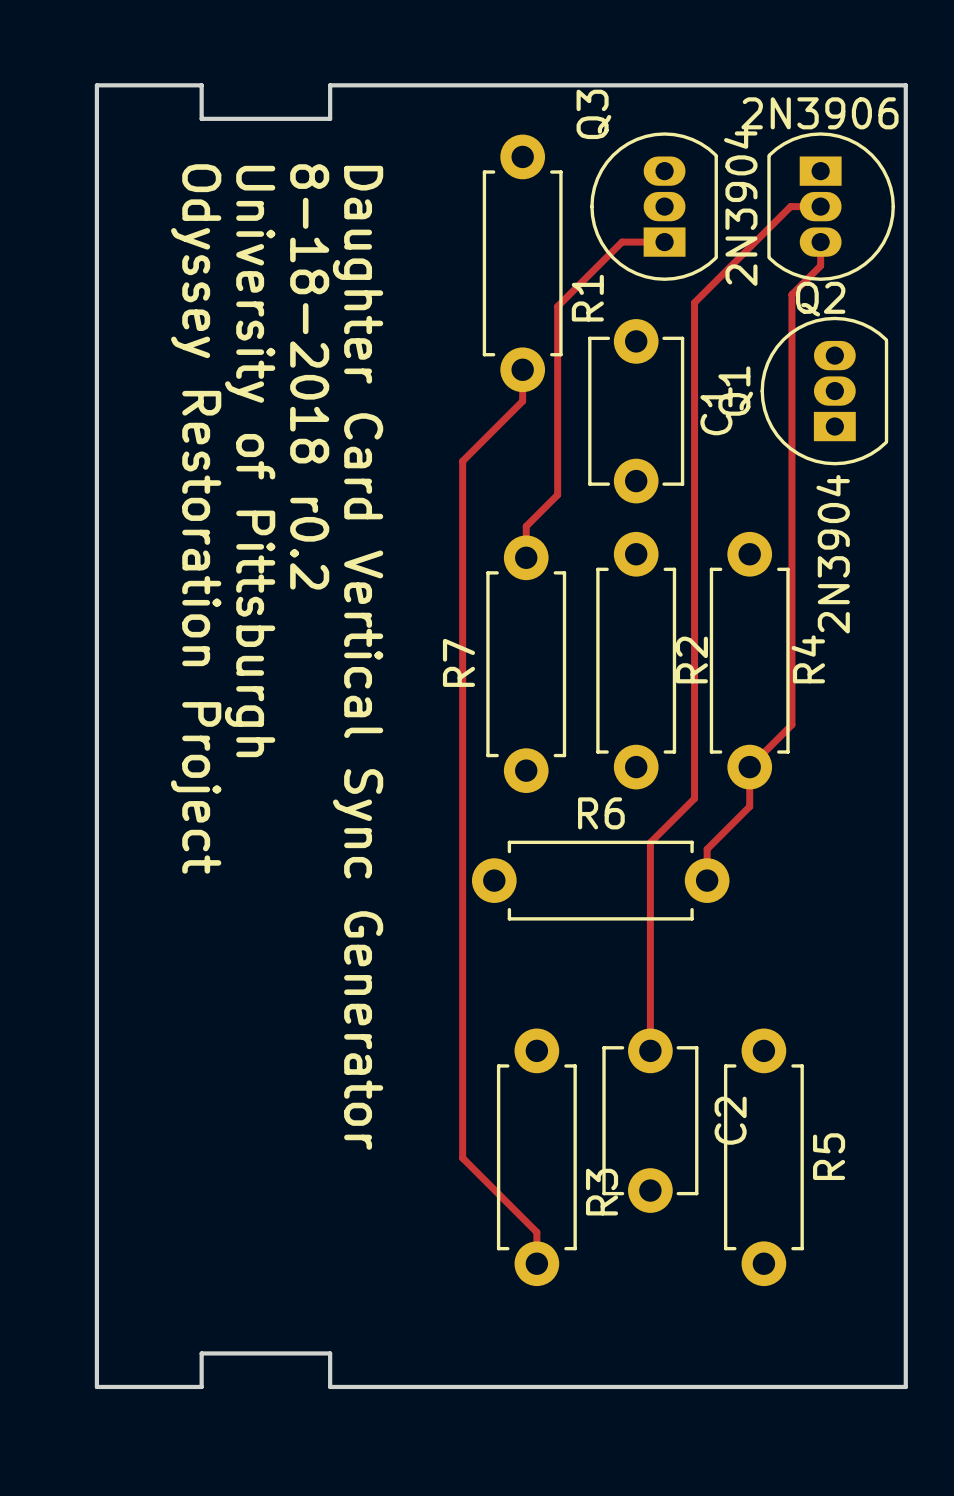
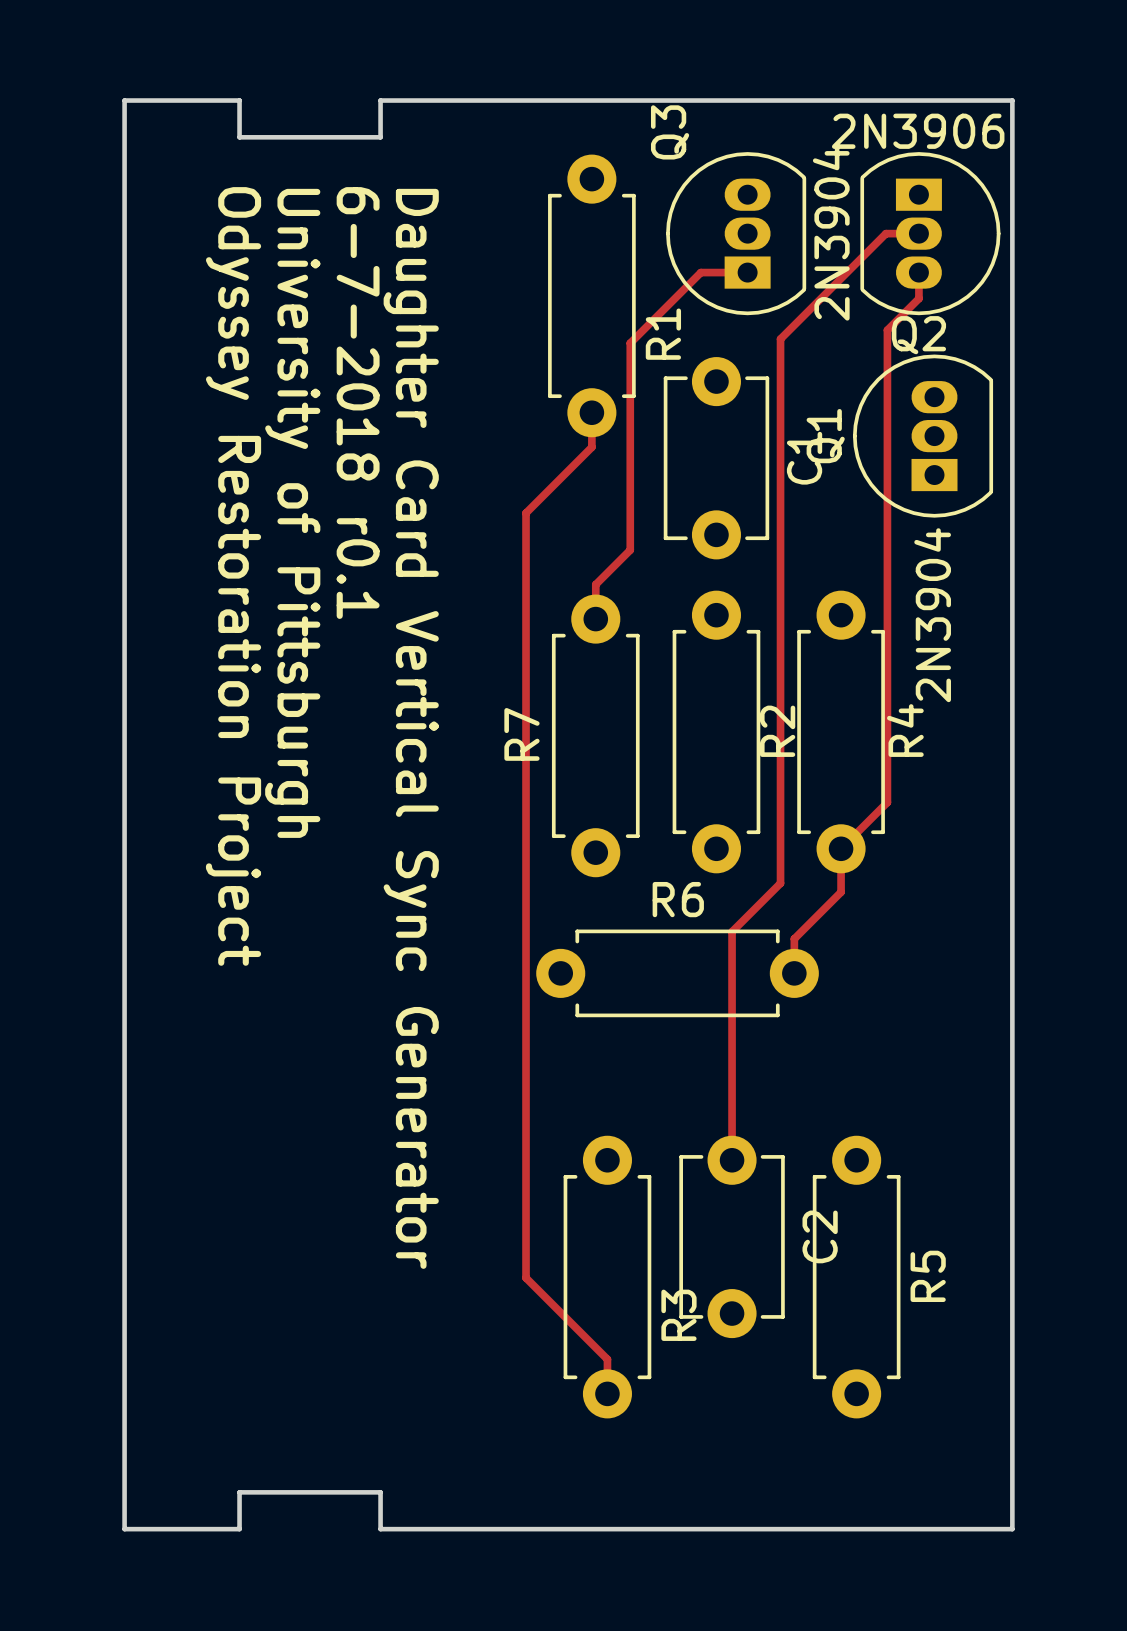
text: 8-18-2018 r0.2 (309, 376) -> 6-7-2018 r0.1 (358, 403)

